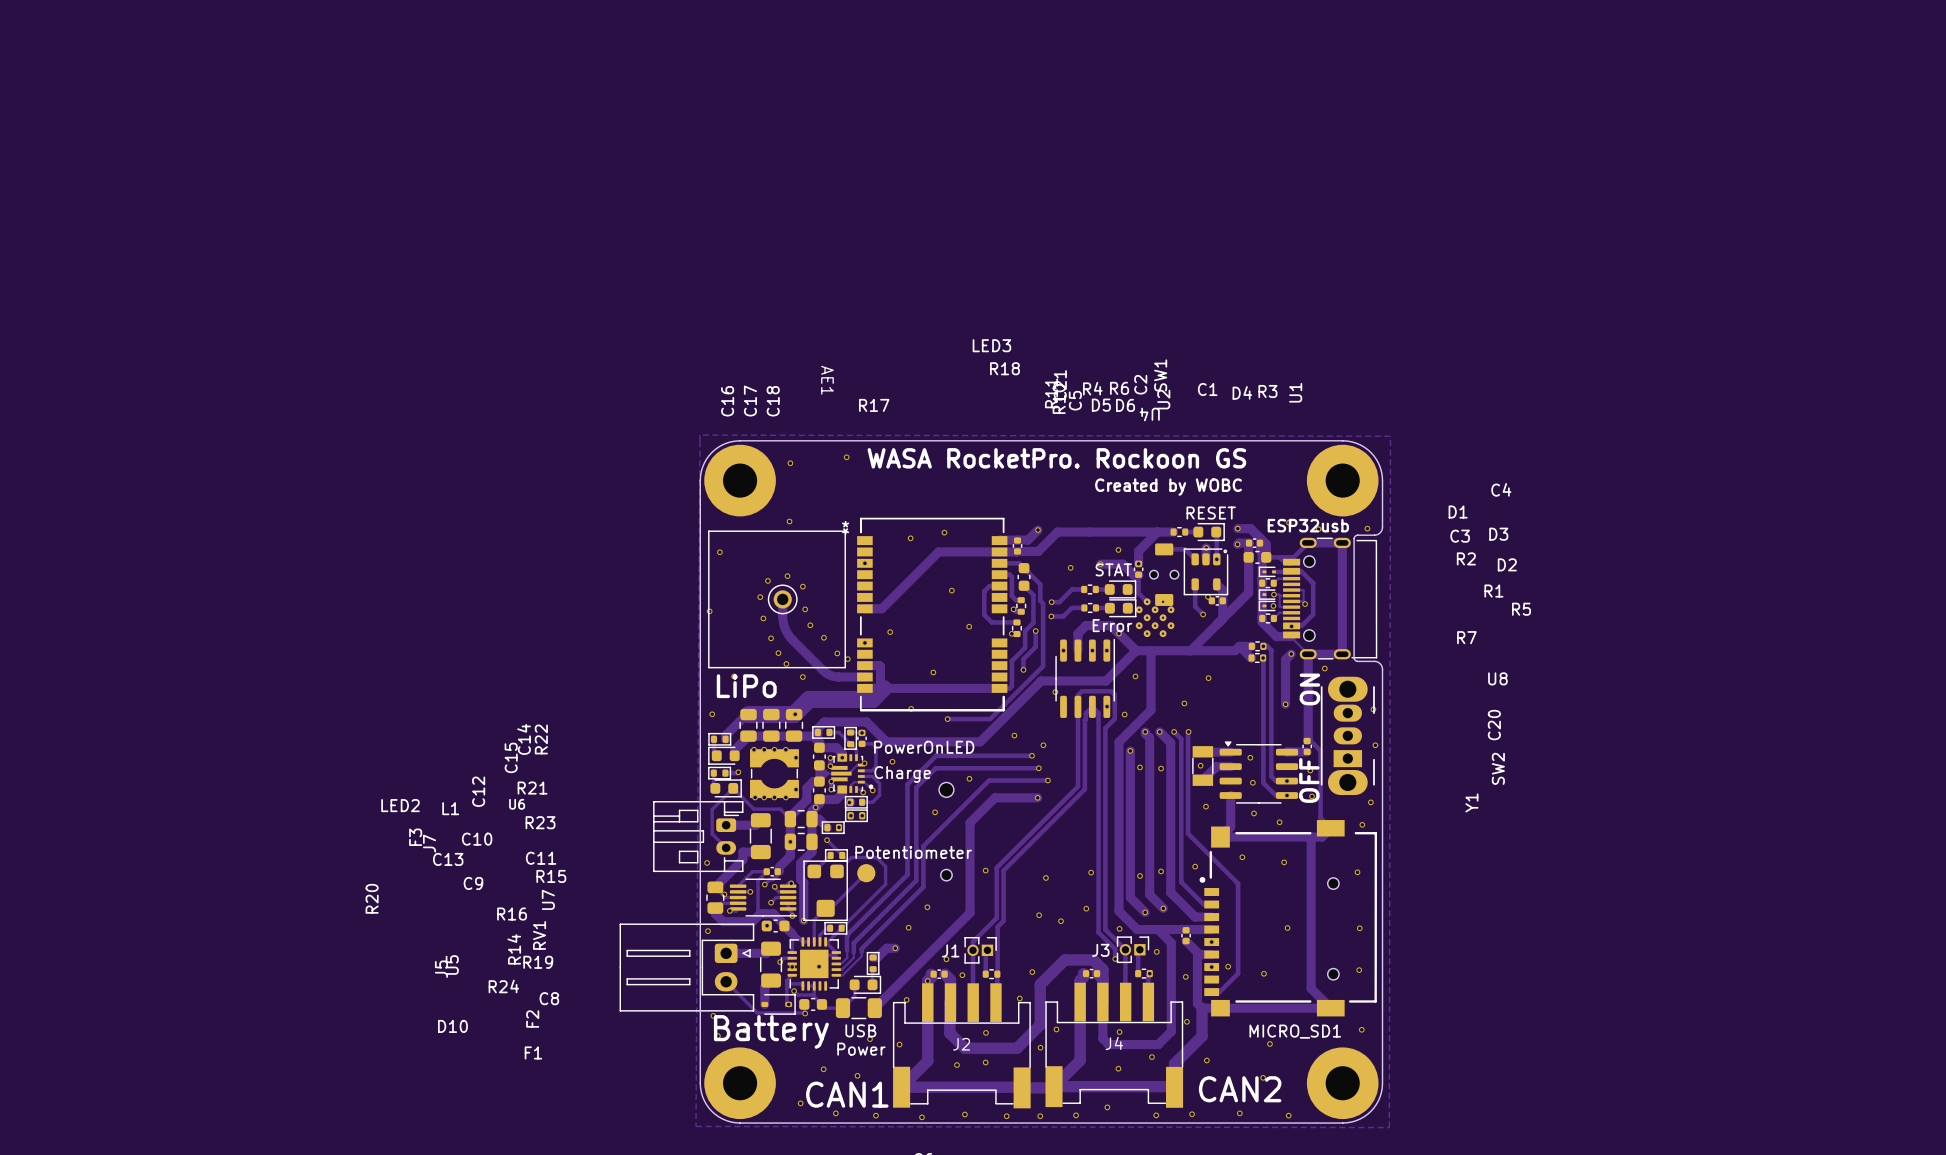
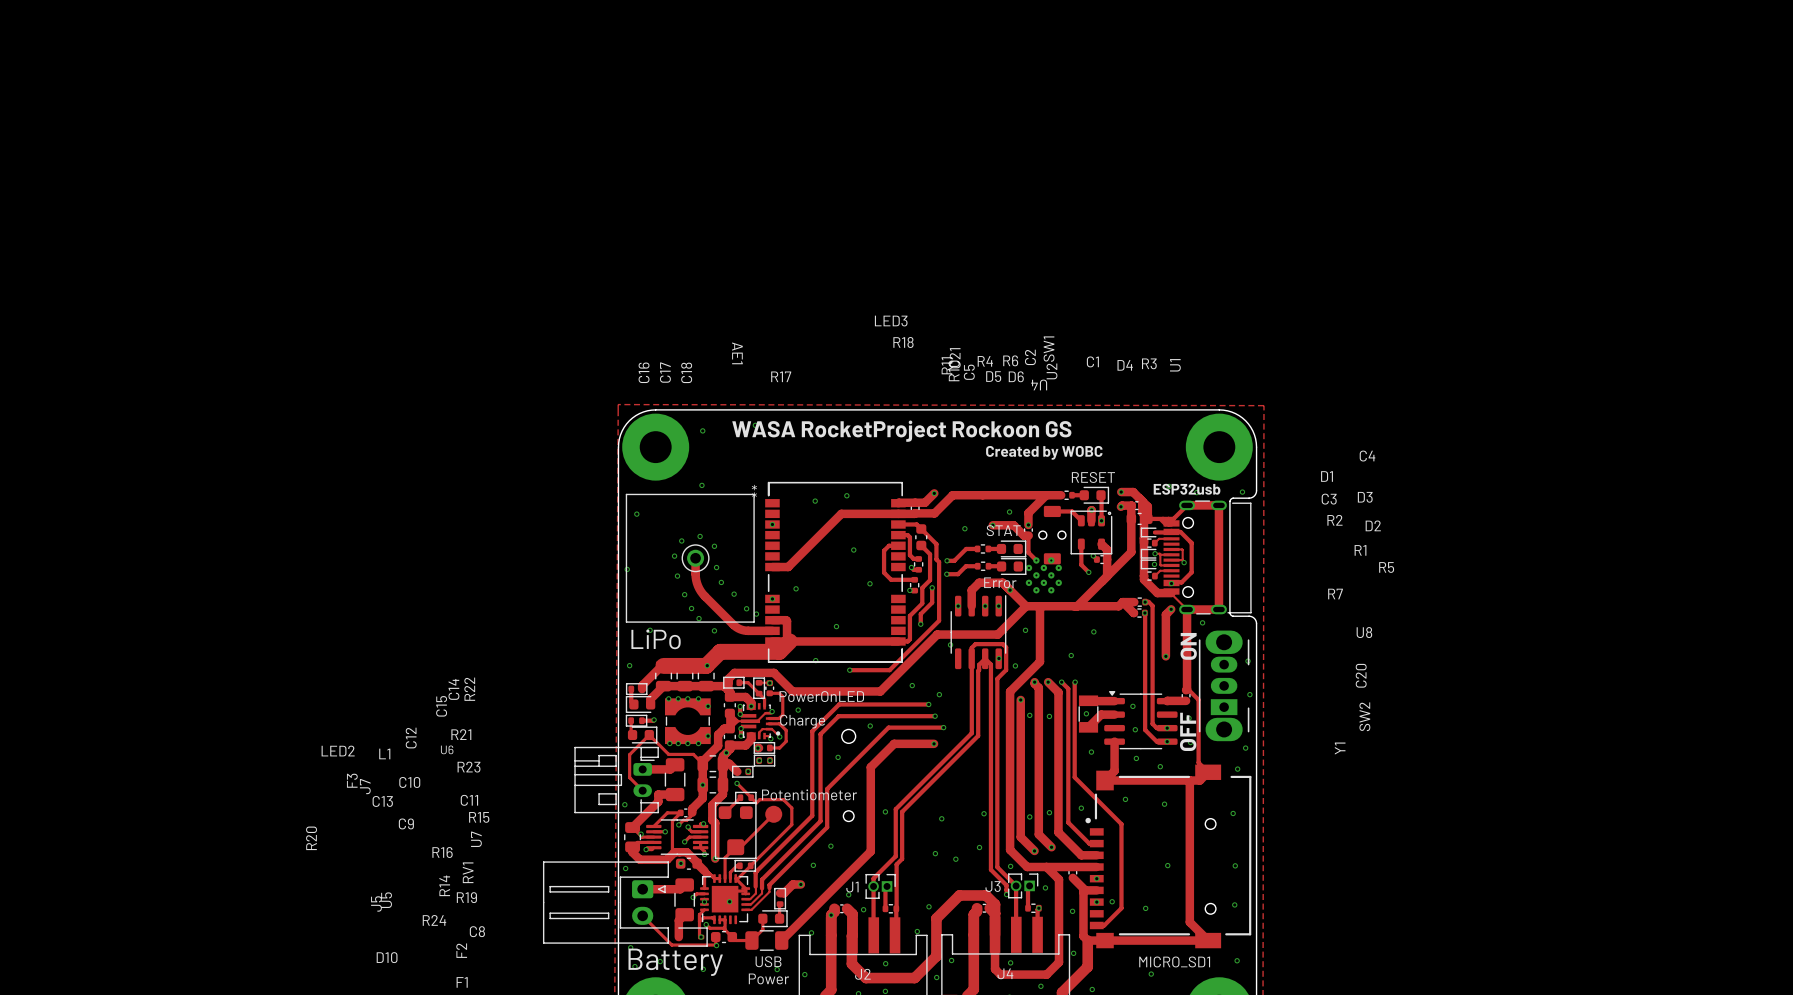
text: WASA RocketPro. Rockoon GS (1056, 458) -> WASA RocketProject Rockoon GS (901, 431)

